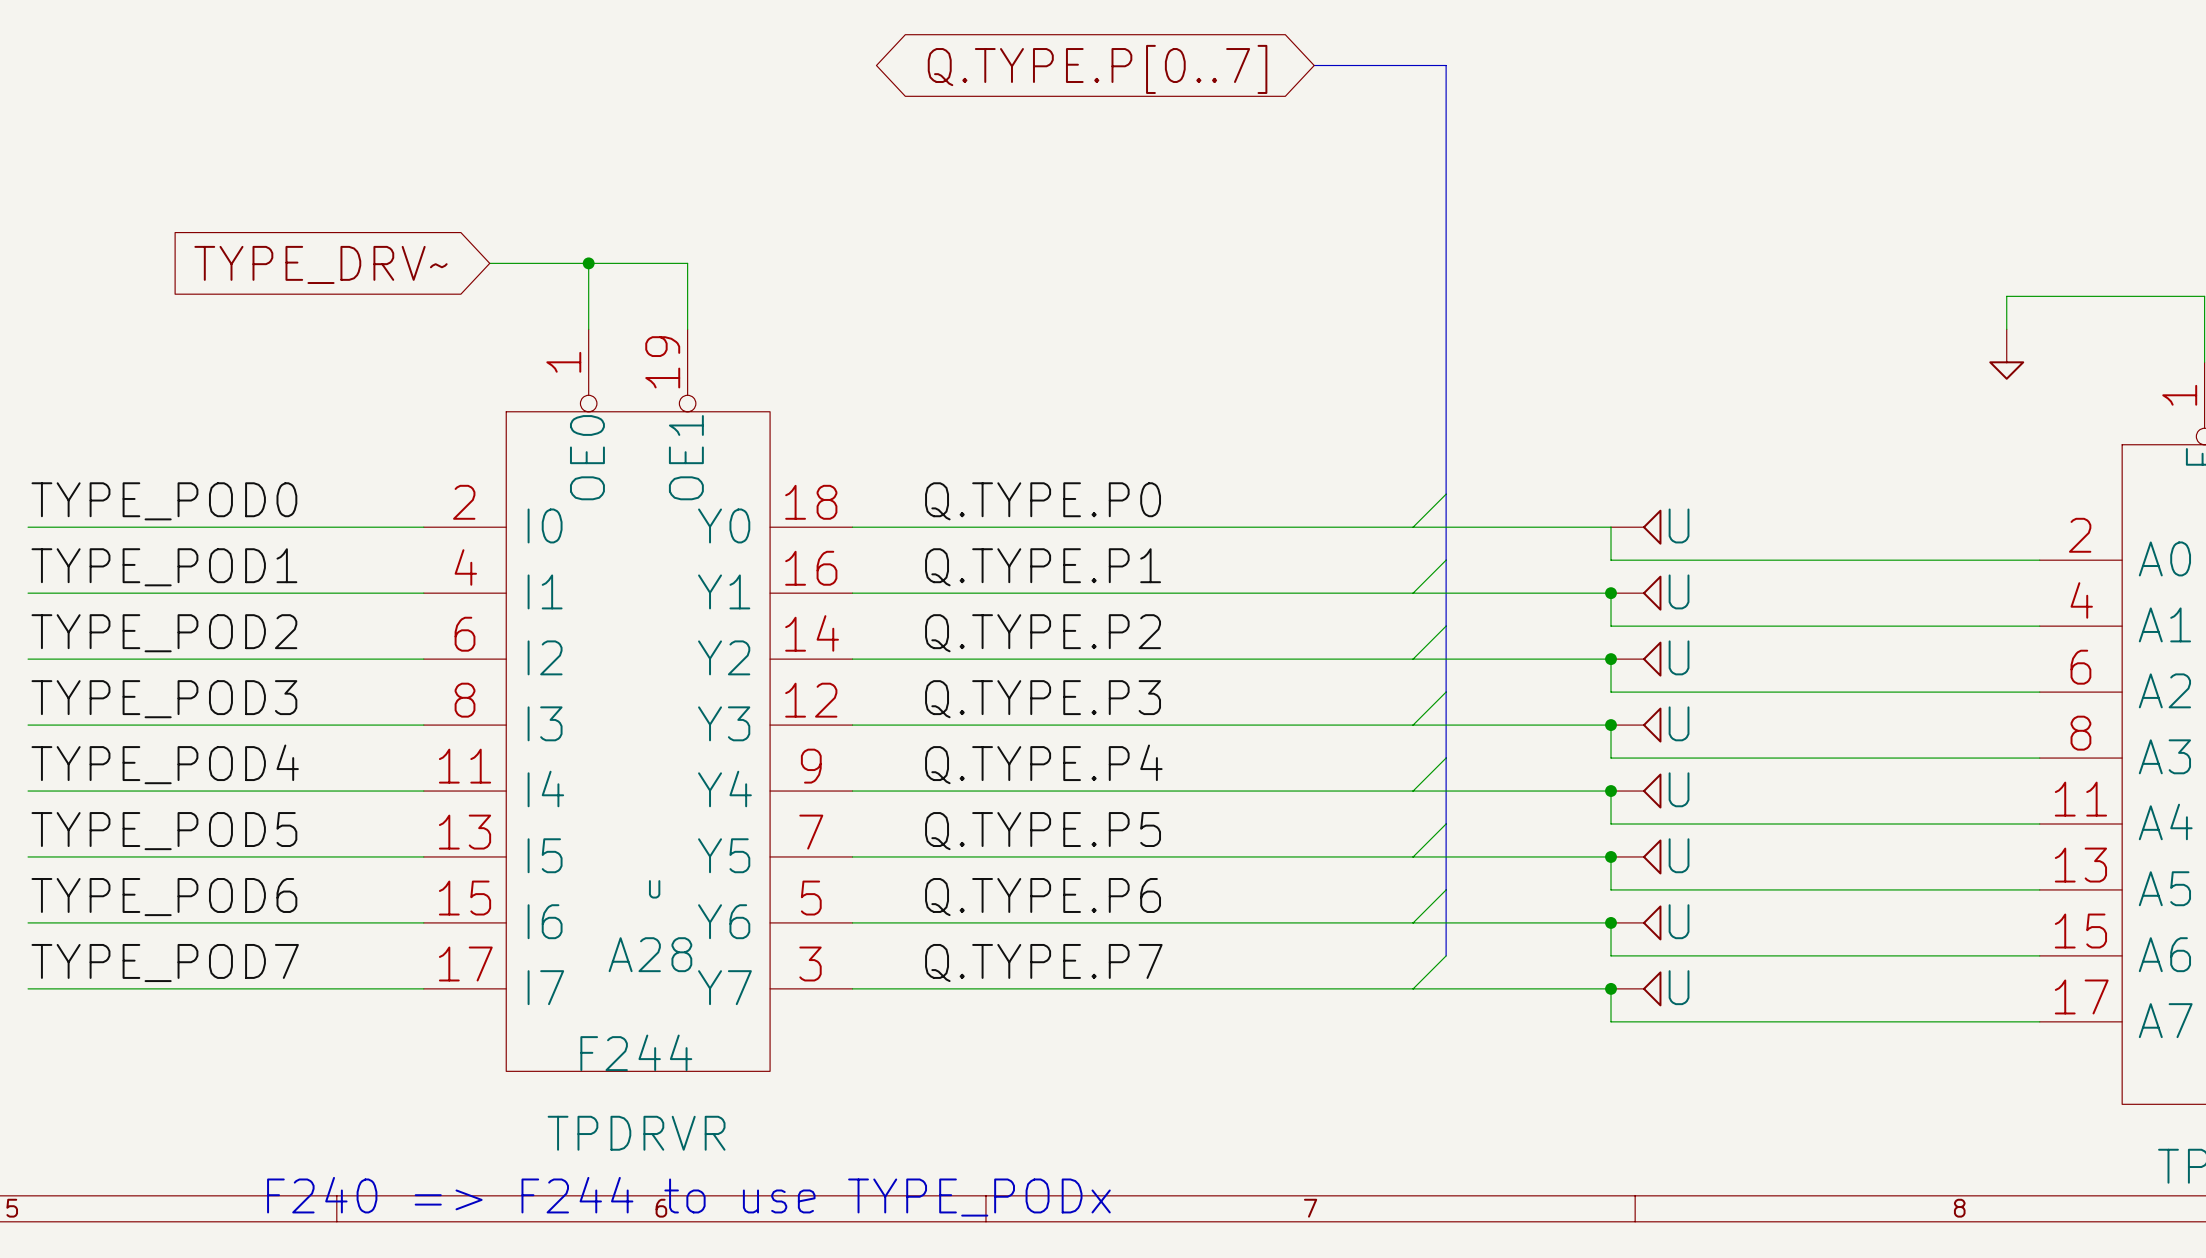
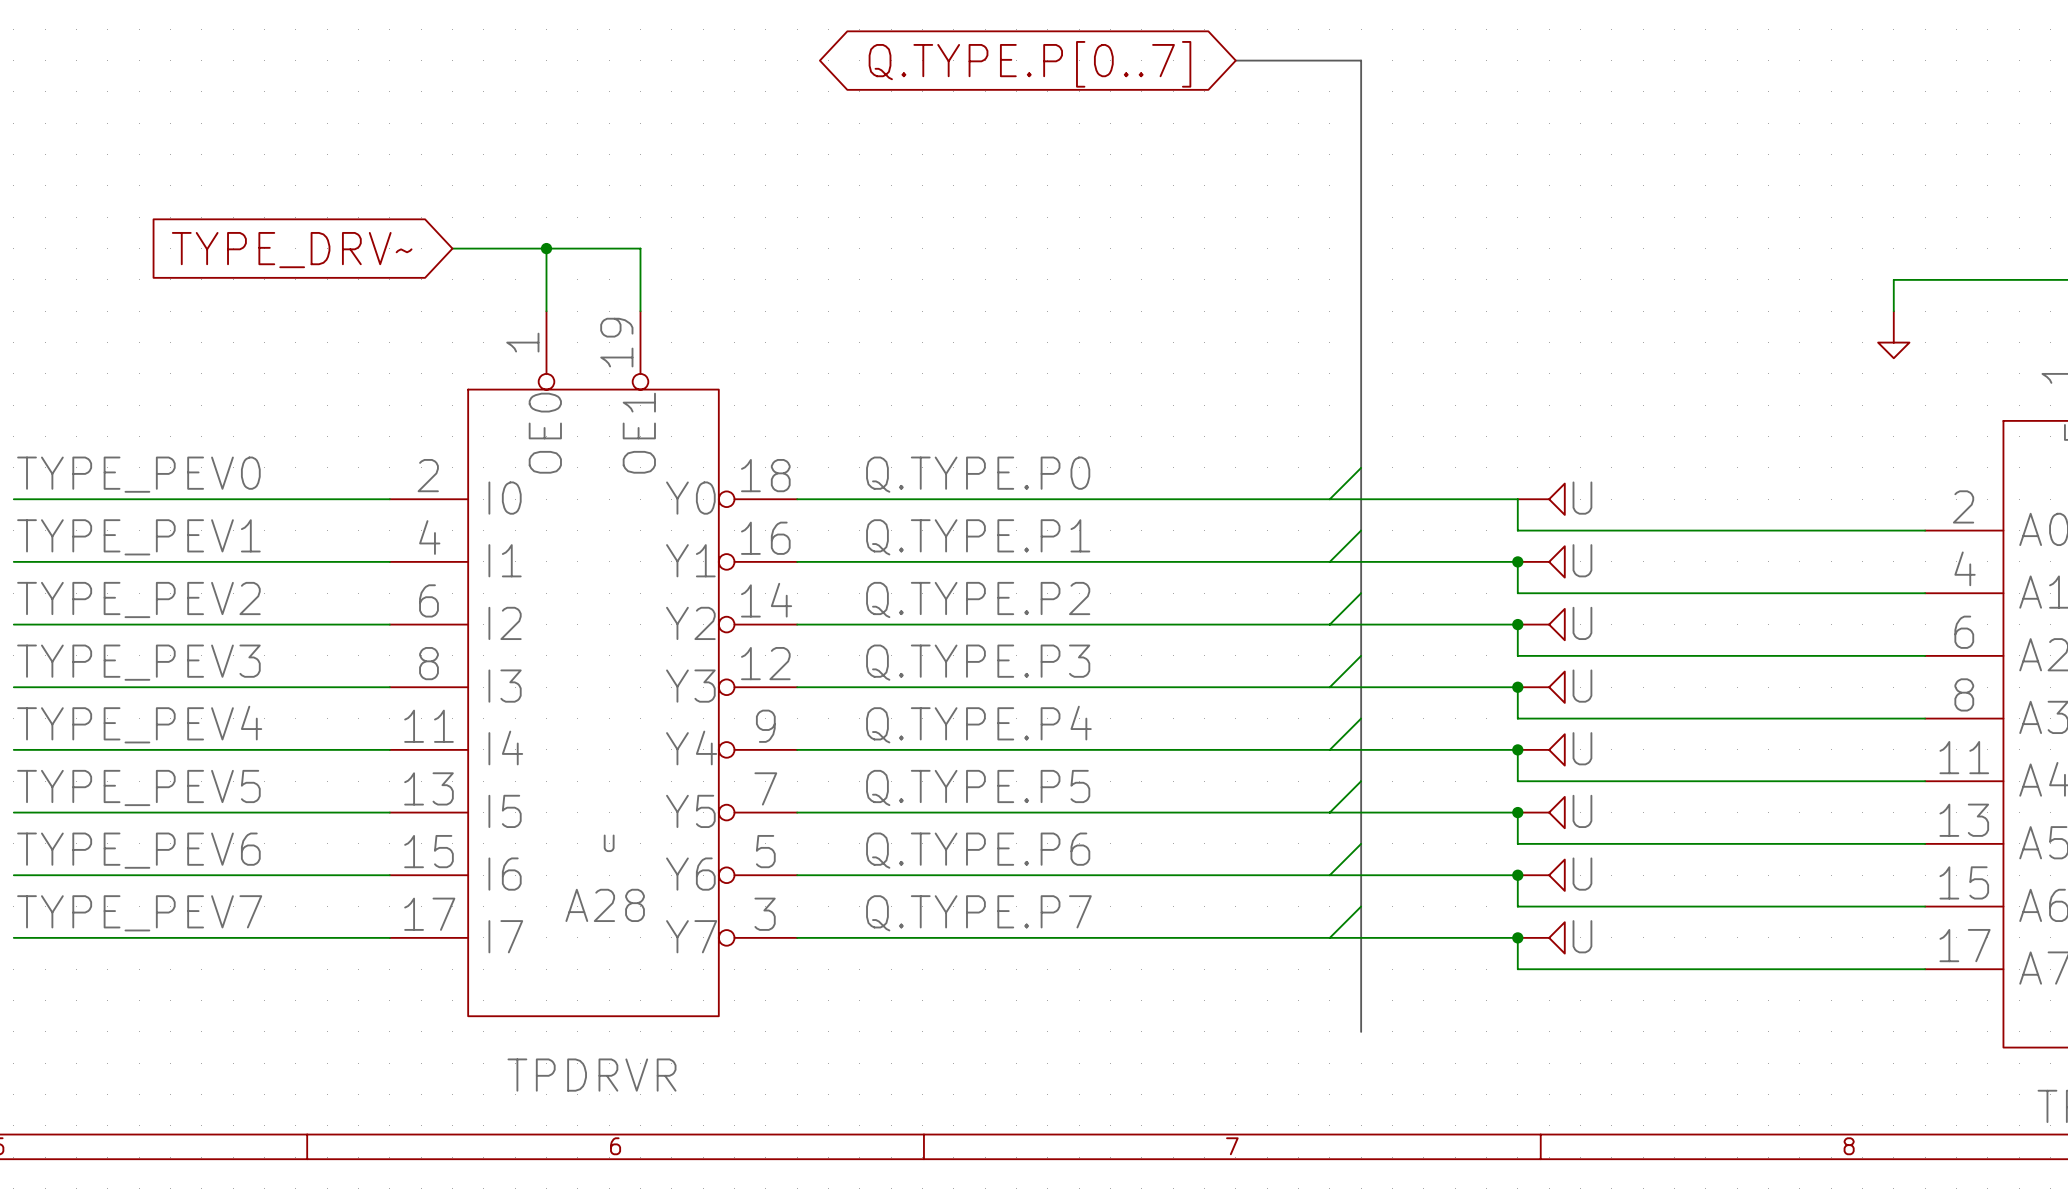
U symbol: [423, 329, 853, 1072] -> [389, 311, 798, 1017]
label: TYPE_POD0 (164, 501) -> TYPE_PEV0 (138, 474)
label: TYPE_POD1 (164, 567) -> TYPE_PEV1 (138, 537)
label: TYPE_POD2 (164, 633) -> TYPE_PEV2 (138, 599)
label: TYPE_POD3 (164, 699) -> TYPE_PEV3 (138, 662)
label: TYPE_POD4 (165, 764) -> TYPE_PEV4 (139, 724)
label: TYPE_POD5 (164, 831) -> TYPE_PEV5 (138, 787)
label: TYPE_POD6 (164, 897) -> TYPE_PEV6 (138, 850)
bus: none -> (1361, 906) (1361, 1031)
label: TYPE_POD7 (165, 963) -> TYPE_PEV7 (139, 913)
U value: F244 (636, 1052) -> none
text: F240 => F244 to use TYPE_PODx (688, 1196) -> none

